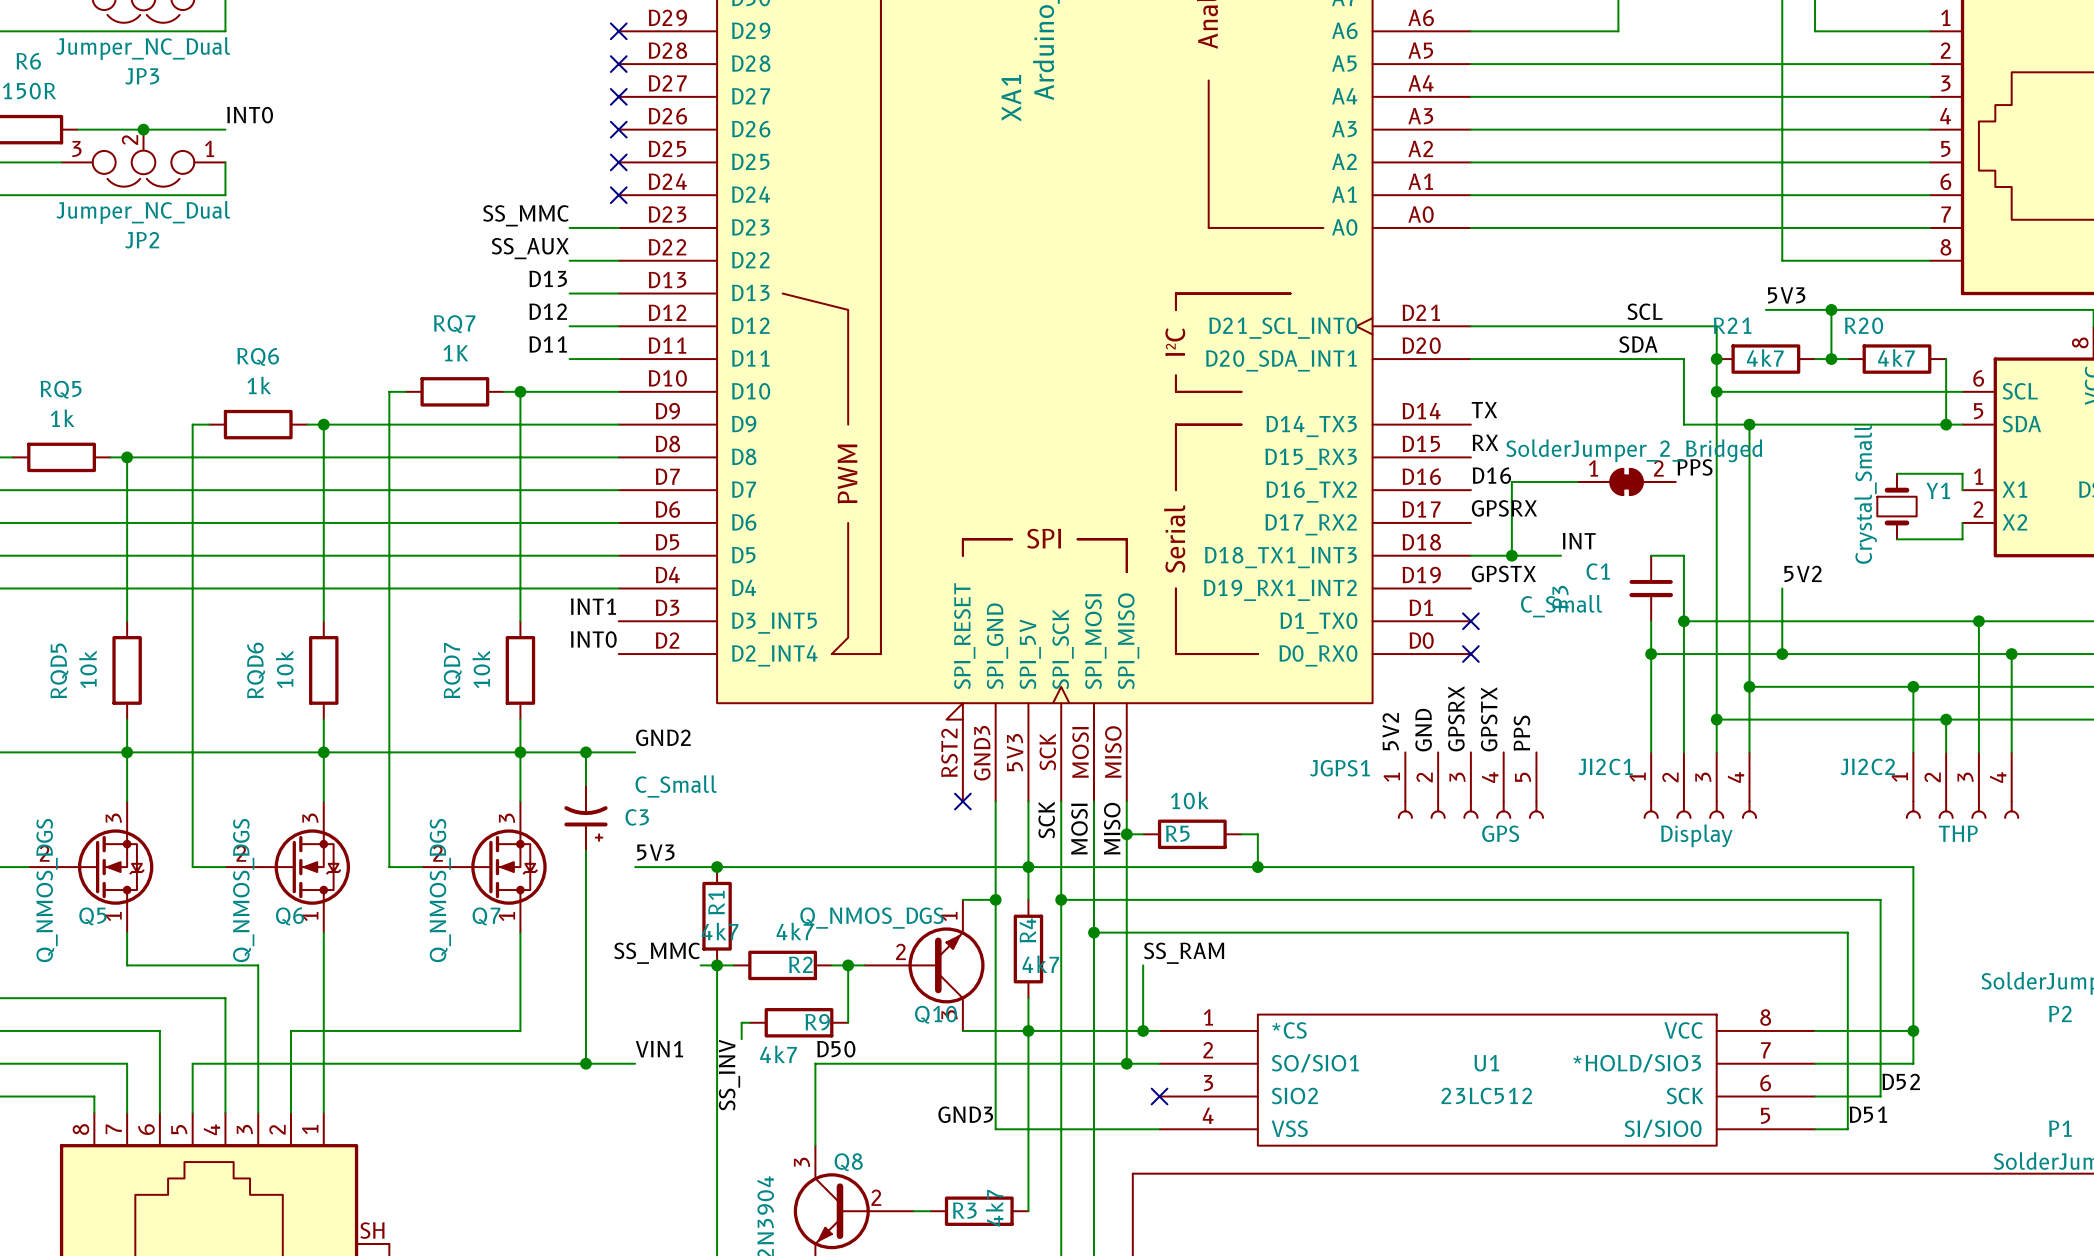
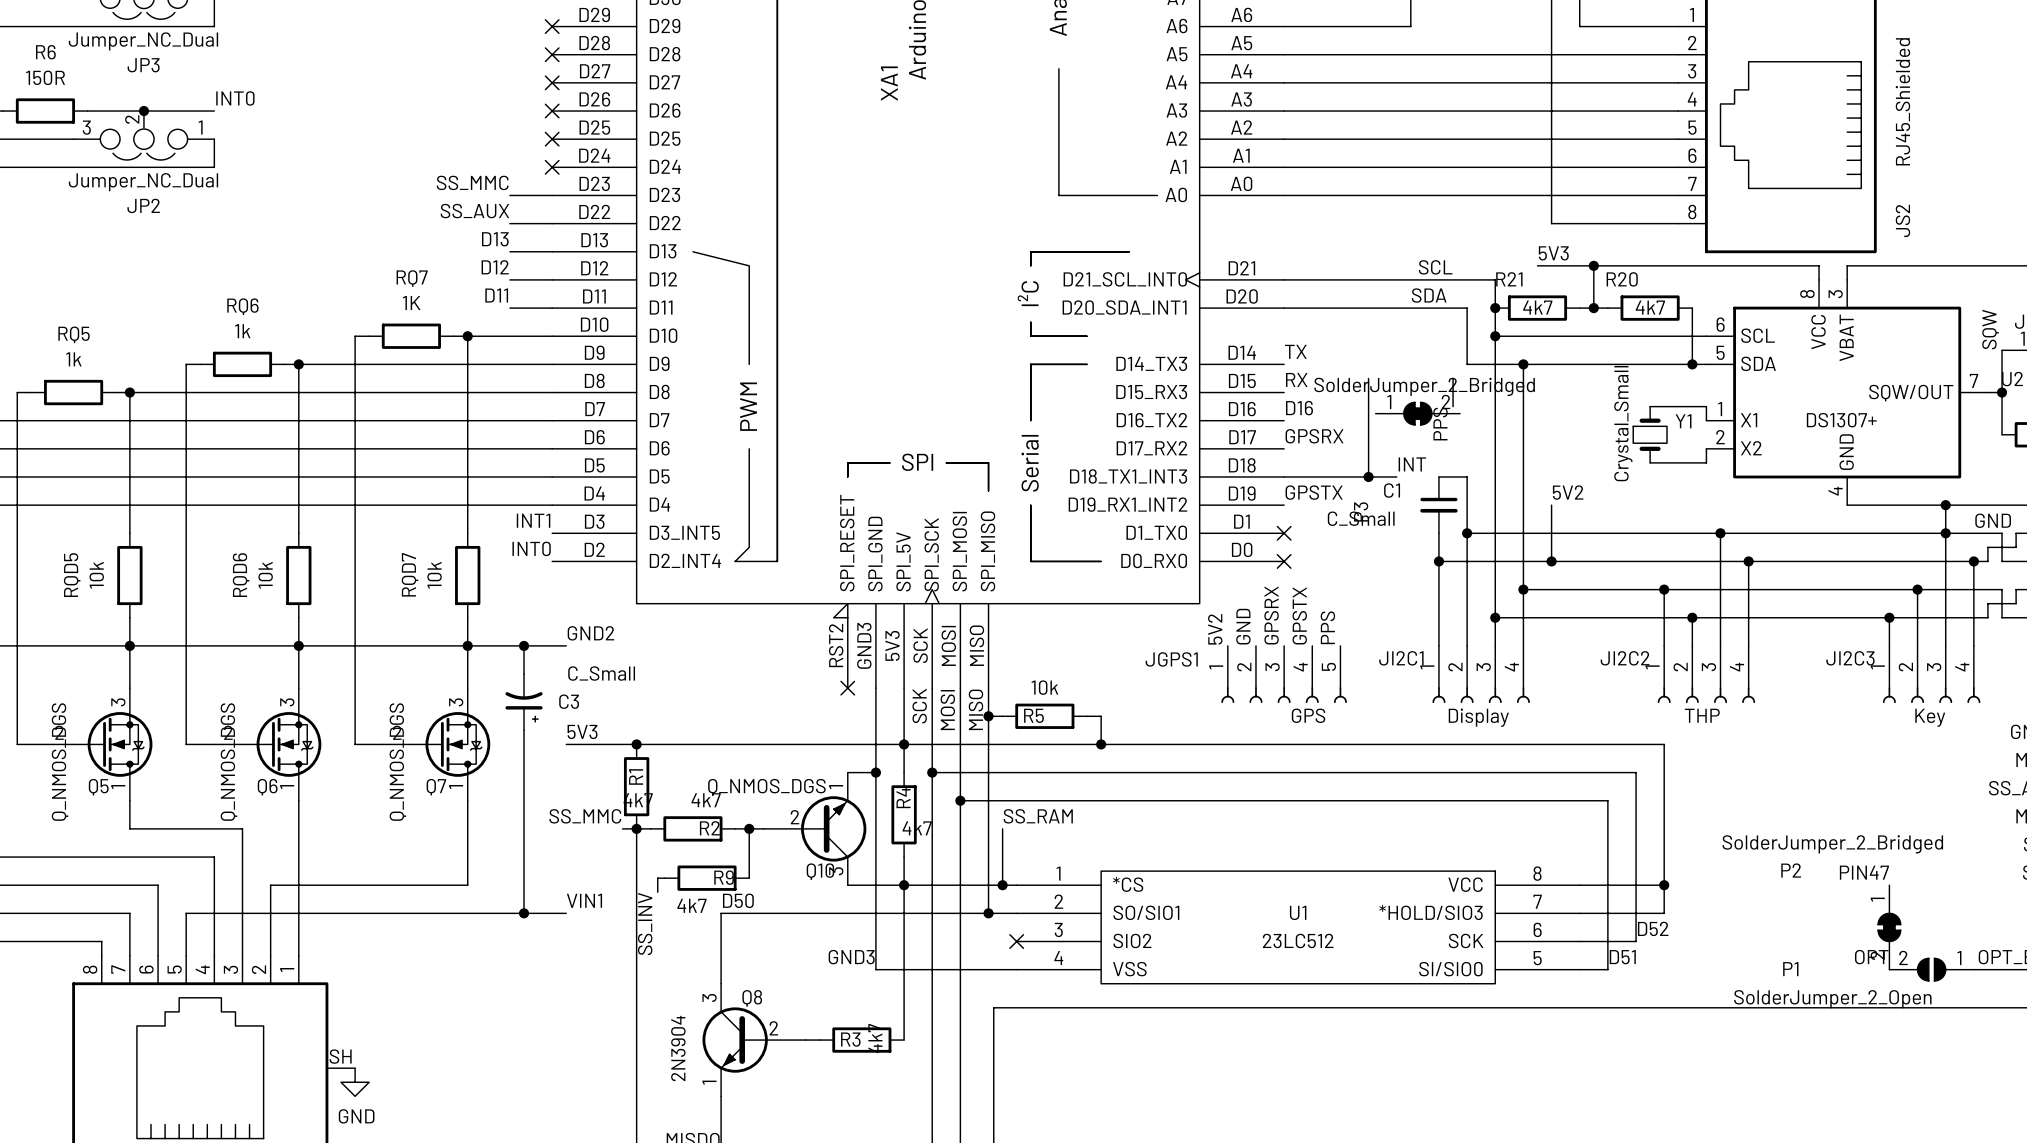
wire: none -> (1368, 378) (1368, 476)
wire: none -> (1453, 378) (1453, 406)
label rotation: 0° (1694, 467) -> 90° counterclockwise (1440, 424)
label position: PPS (1694, 467) -> PPS (1440, 424)
wire: (1577, 481) (1511, 481) (1511, 555) -> none
label position: INT (1579, 541) -> INT (1412, 464)
junction position: (1511, 555) -> (1368, 476)
wire: none -> (1361, 476) (1396, 476)

